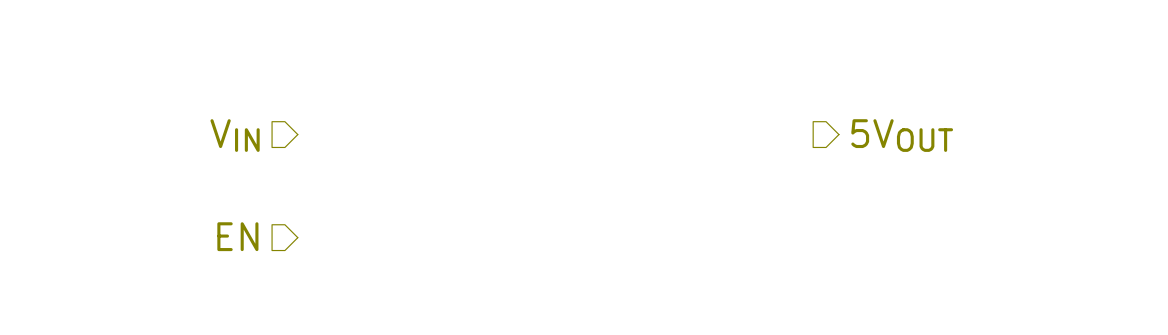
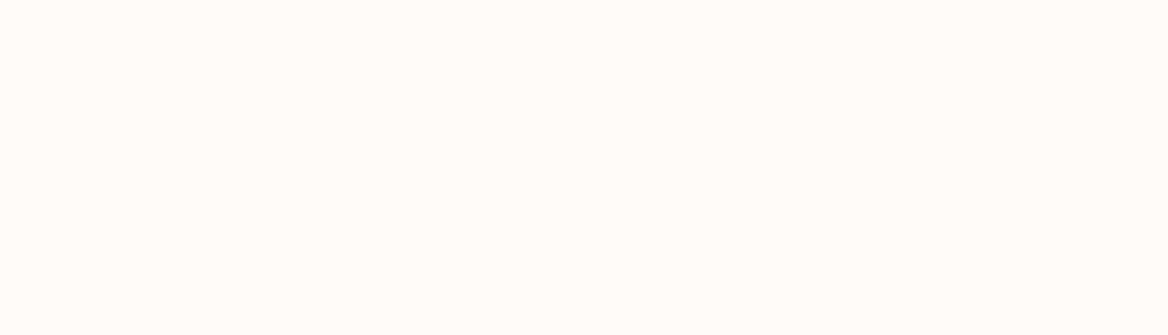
hierarchical label: VIN (235, 135) -> none
hierarchical label: 5VOUT (902, 135) -> none
hierarchical label: EN (237, 236) -> none

